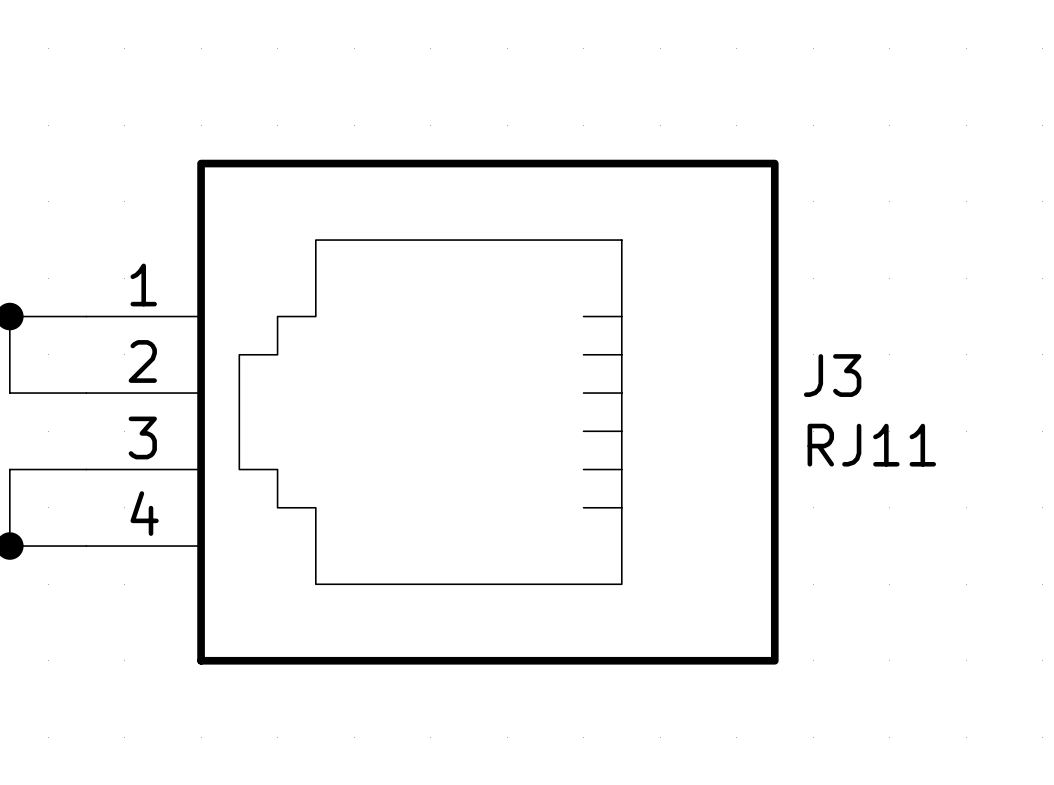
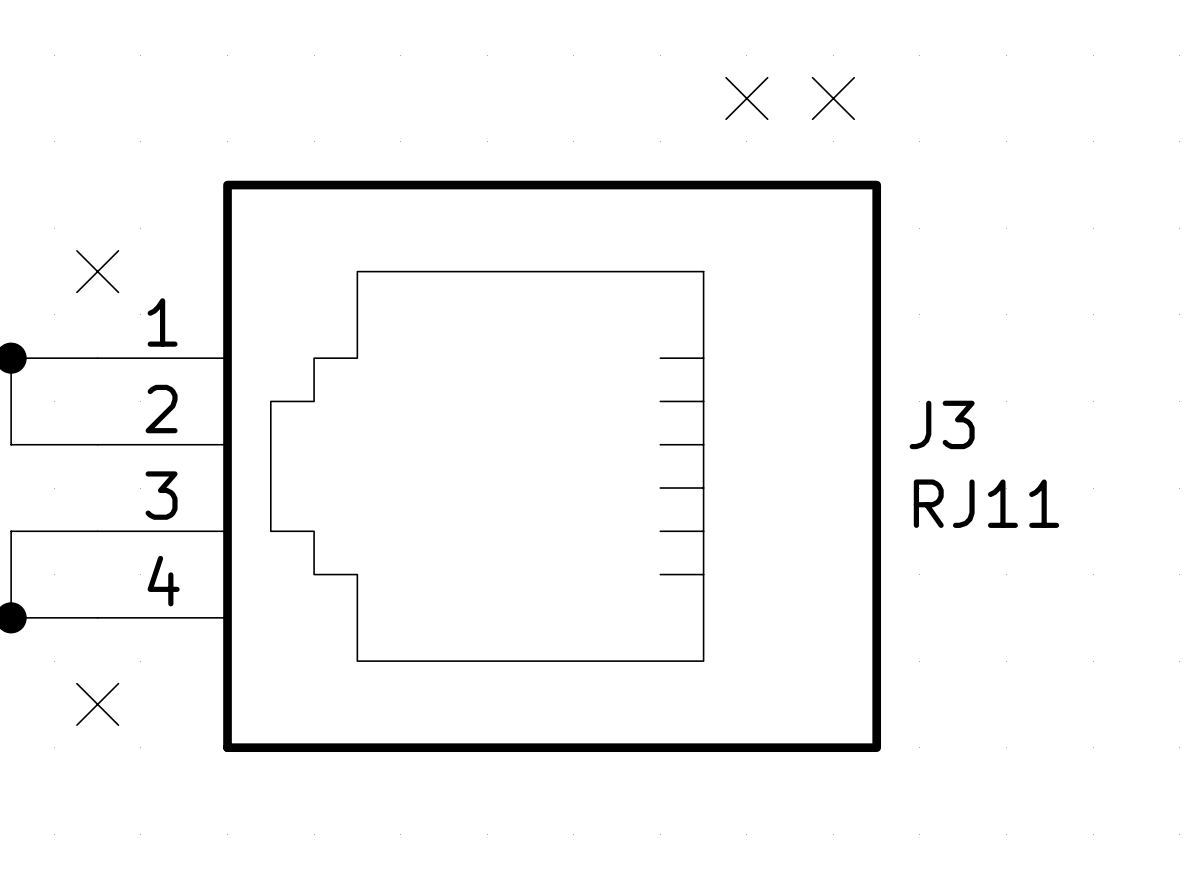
no-connect mark: none -> (746, 98)
no-connect mark: none -> (833, 98)
no-connect mark: none -> (97, 271)
no-connect mark: none -> (97, 704)

